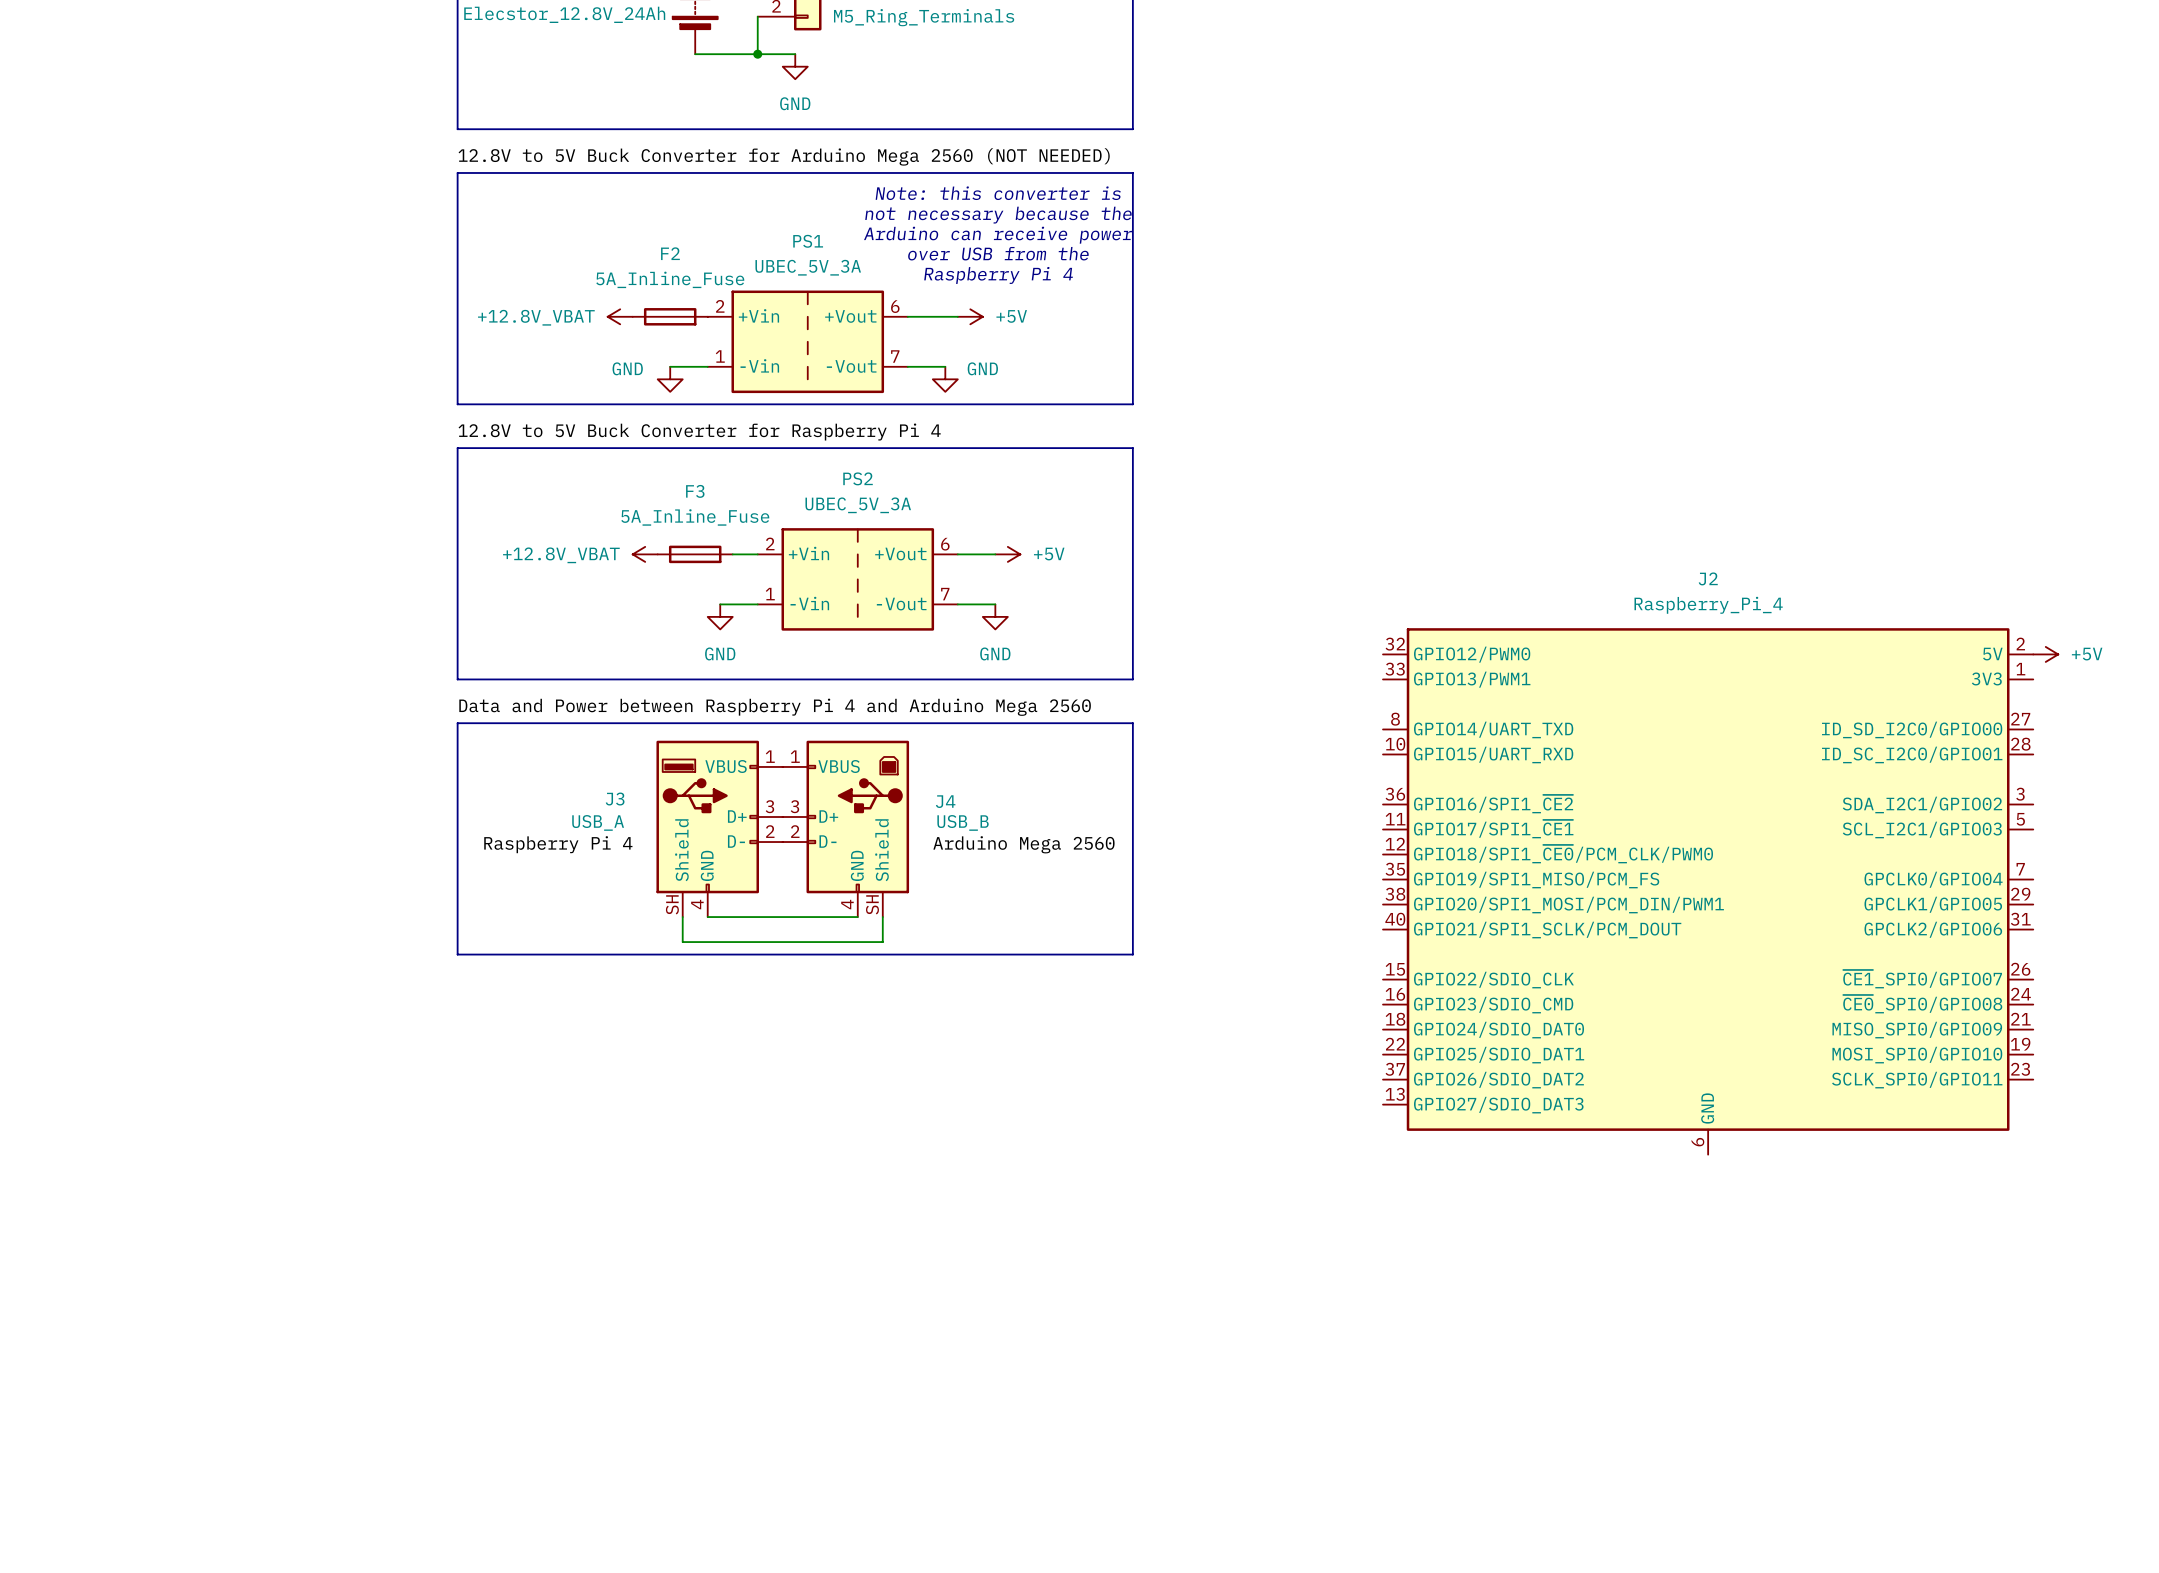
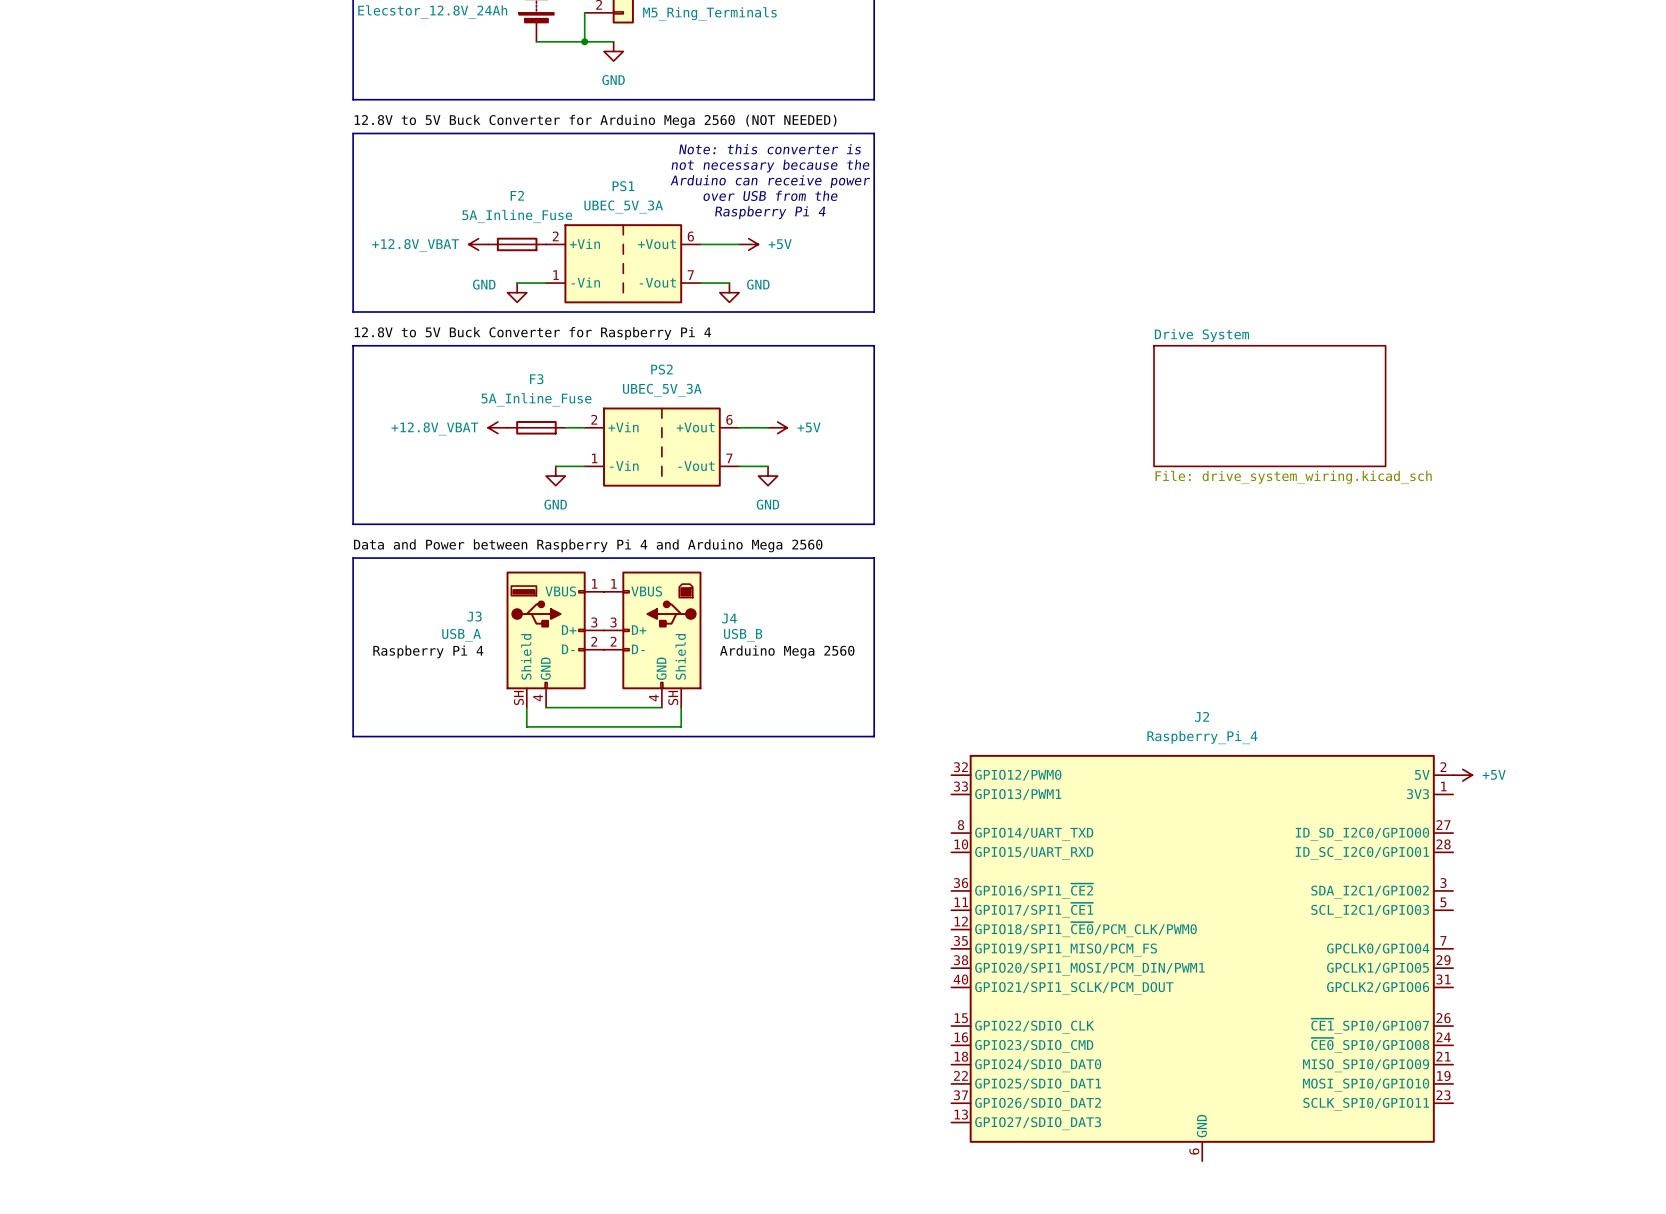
sheet Drive System: none -> File: drive_system_wiring.kicad_sch (1269, 406)
power symbol: +5V (2045, 654) -> none
J2 position: (1708, 891) -> (1202, 958)
power symbol: none -> +5V (1462, 775)

